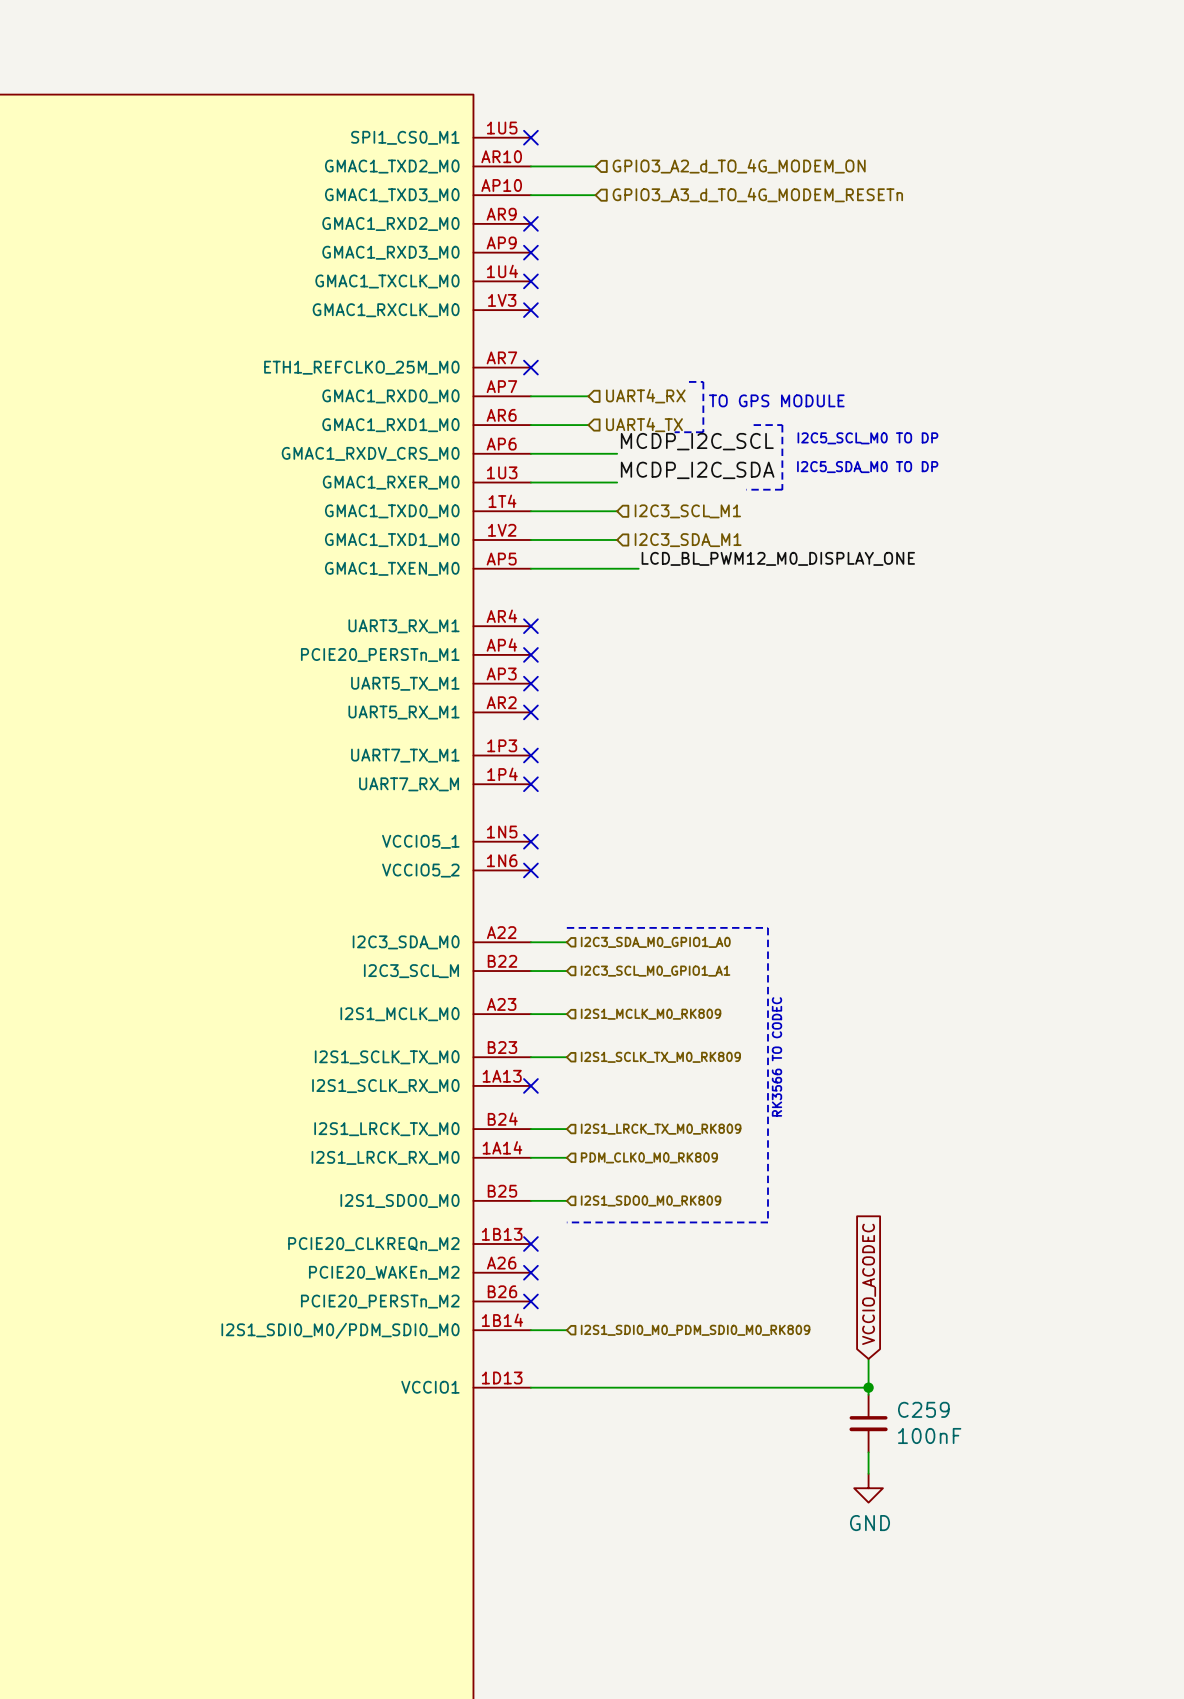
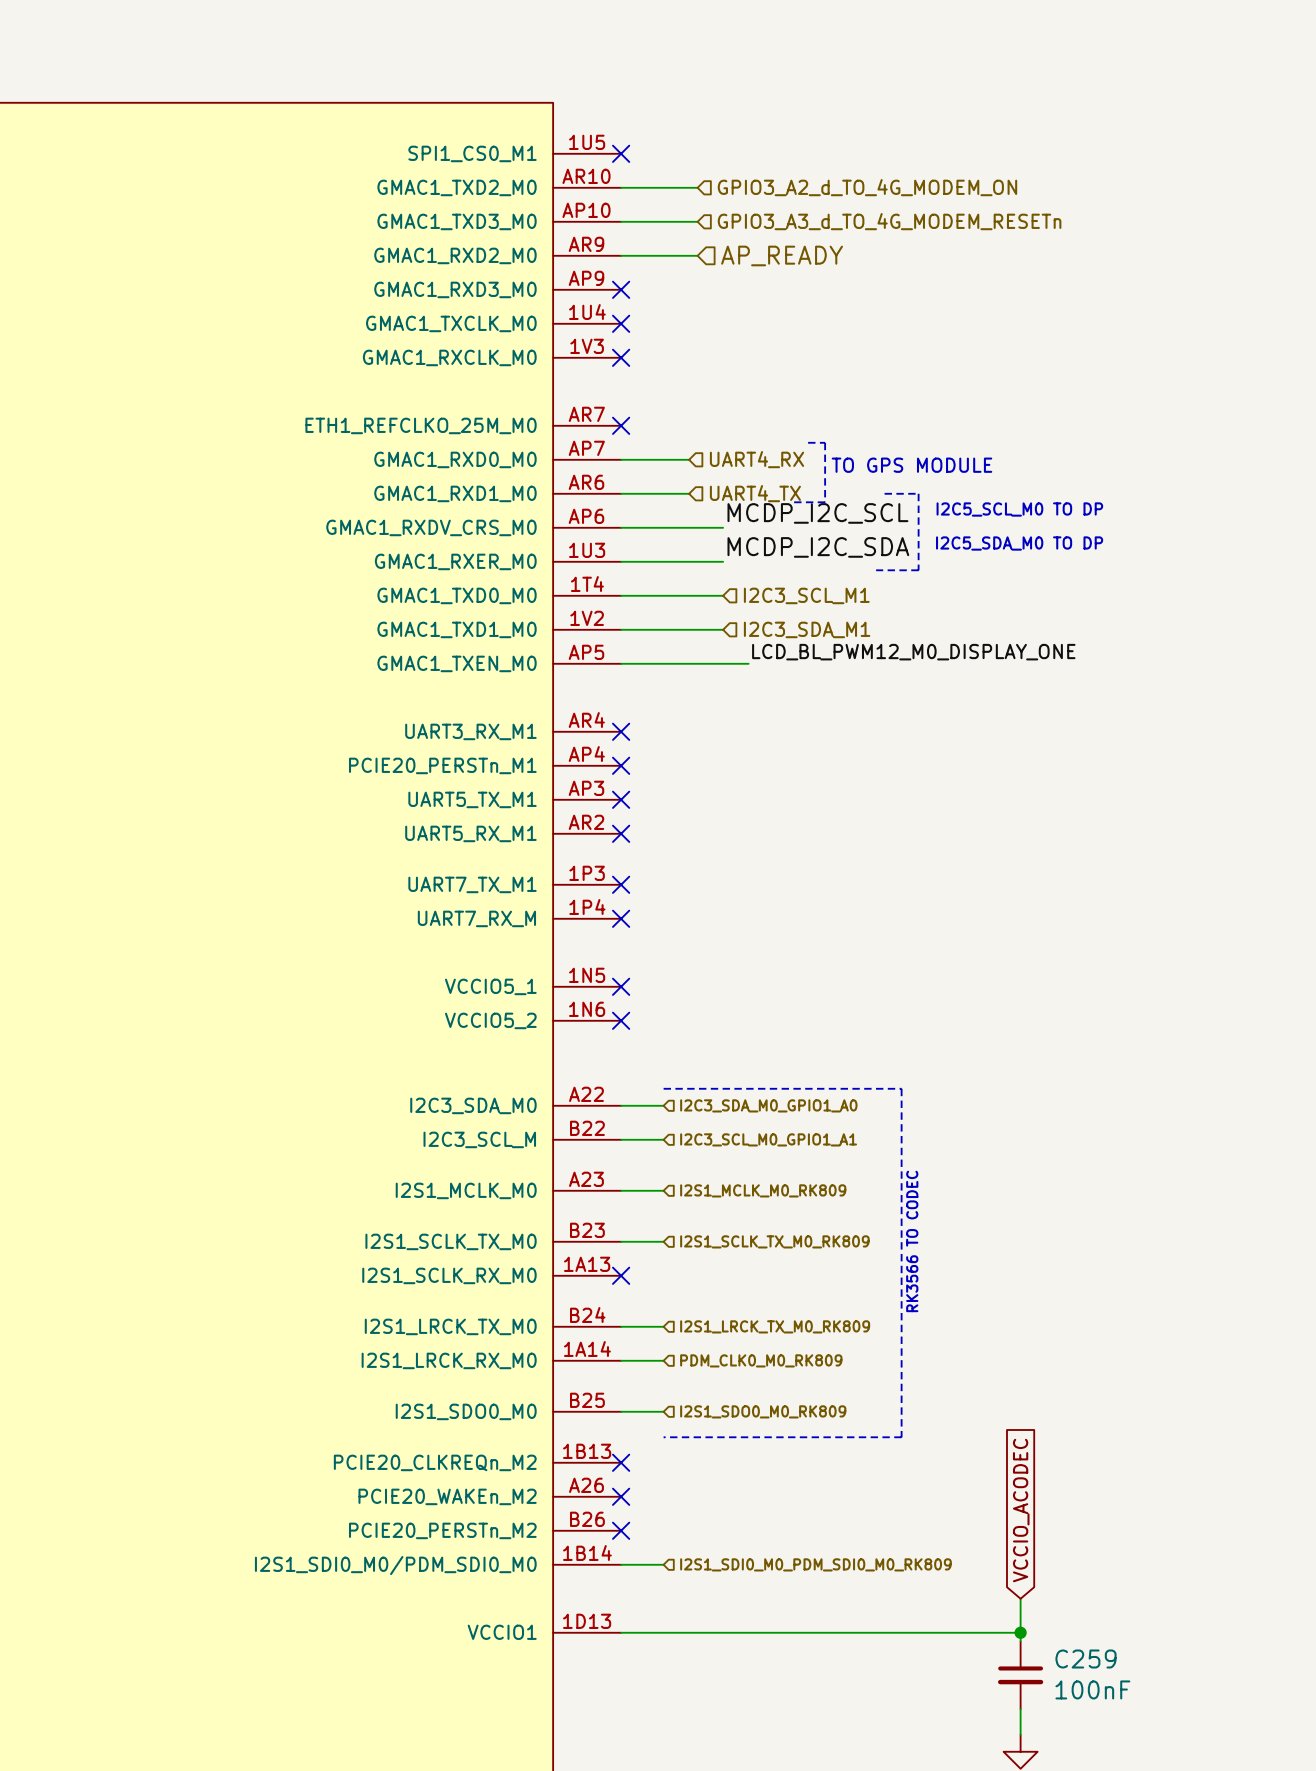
wire: none -> (621, 255) (697, 255)
no-connect mark: (530, 223) -> none
hierarchical label: none -> AP_READY (782, 255)

